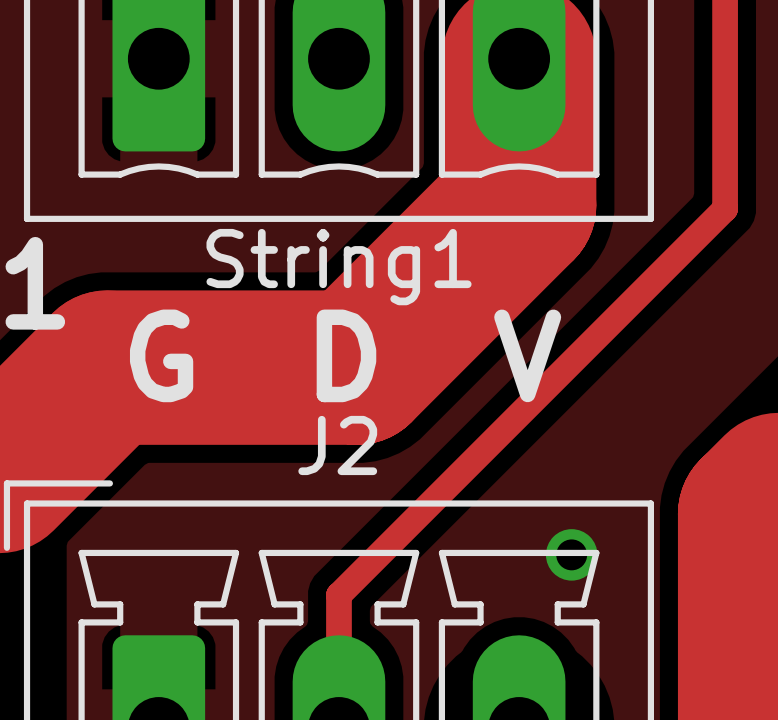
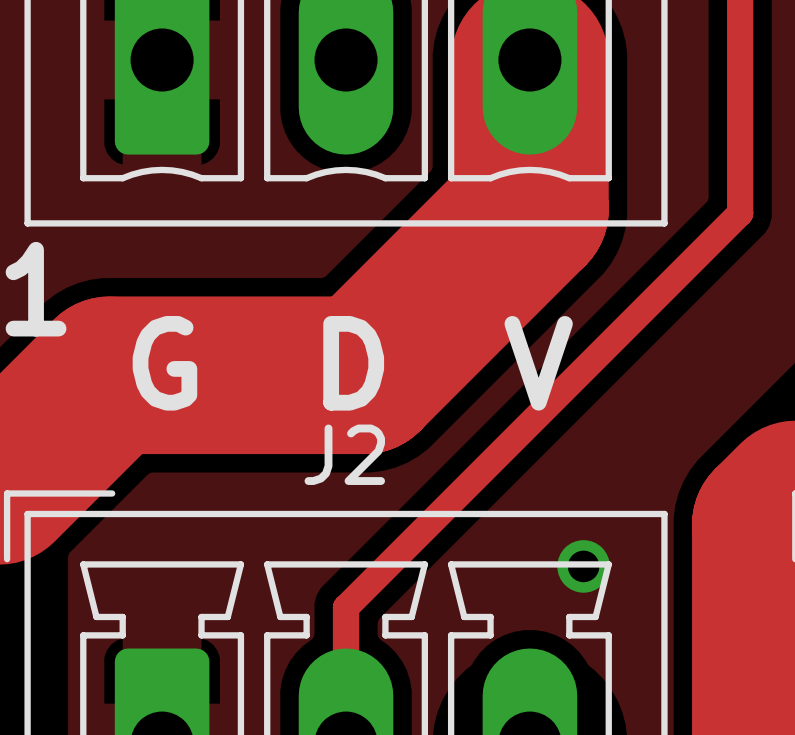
part value: String1 (339, 267) -> none

